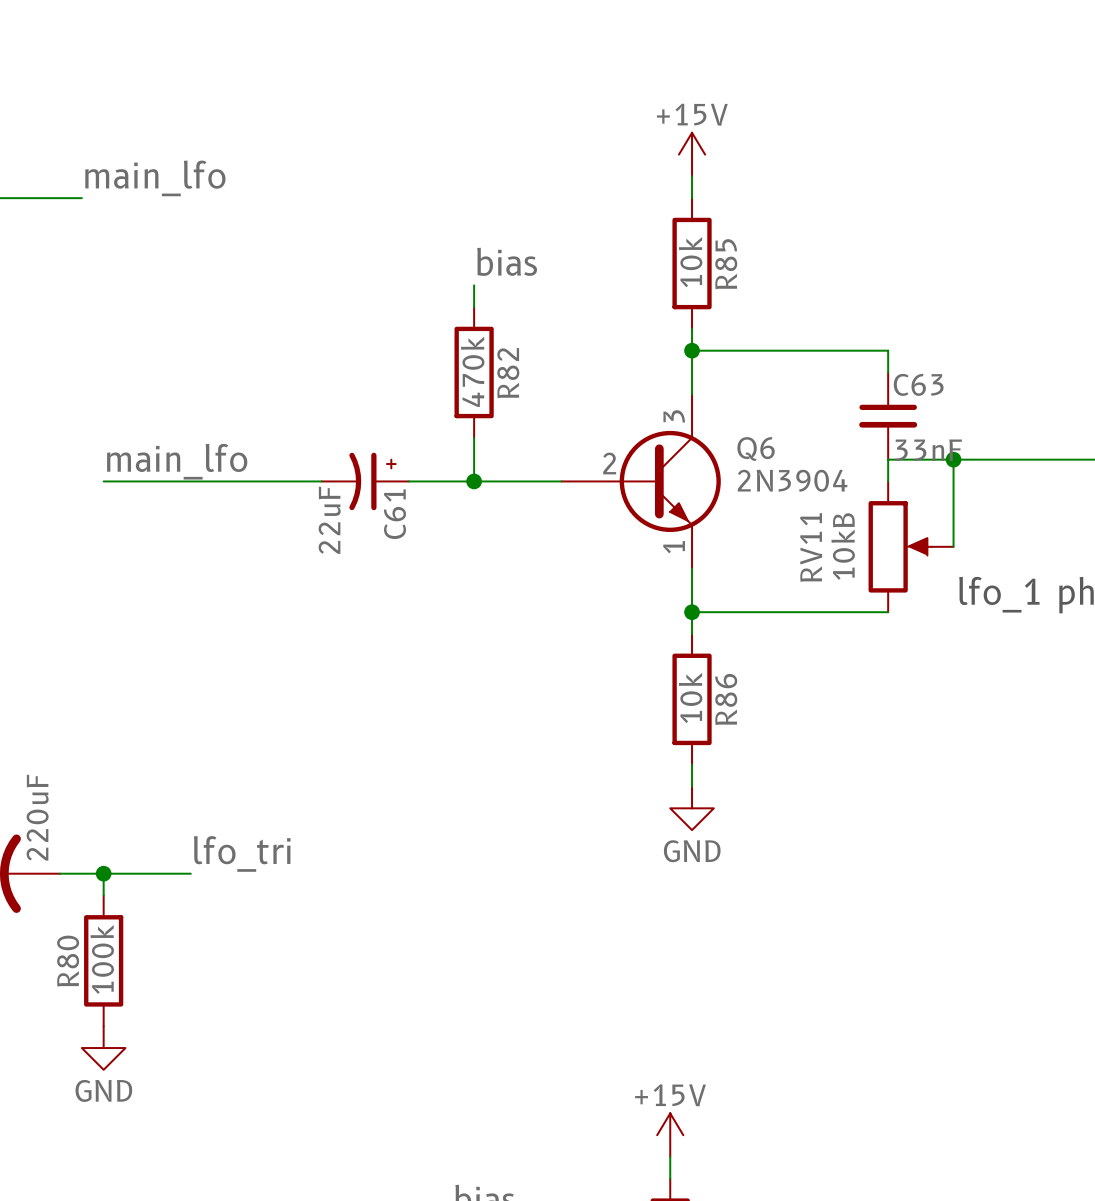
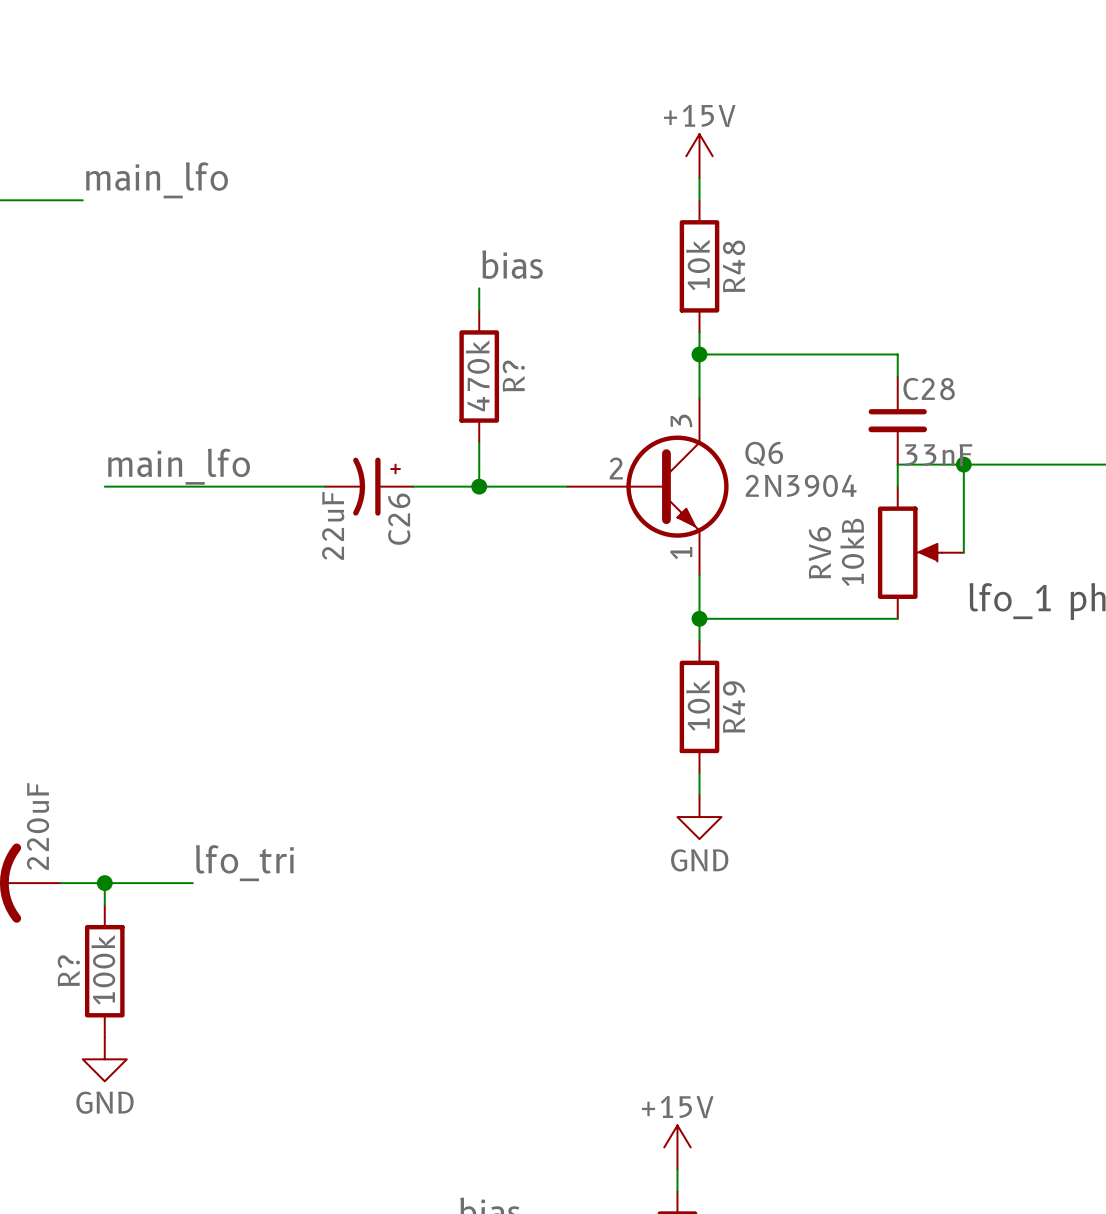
R85 name: R85 (726, 264) -> R48 (734, 266)
R82 name: R82 (508, 373) -> R? (513, 376)
C63 name: C63 (918, 384) -> C28 (929, 389)
C61 name: C61 (394, 514) -> C26 (399, 519)
RV11 name: RV11 (811, 547) -> RV6 (819, 552)
R86 name: R86 (726, 699) -> R49 (734, 707)
R80 name: R80 (68, 961) -> R? (68, 970)

